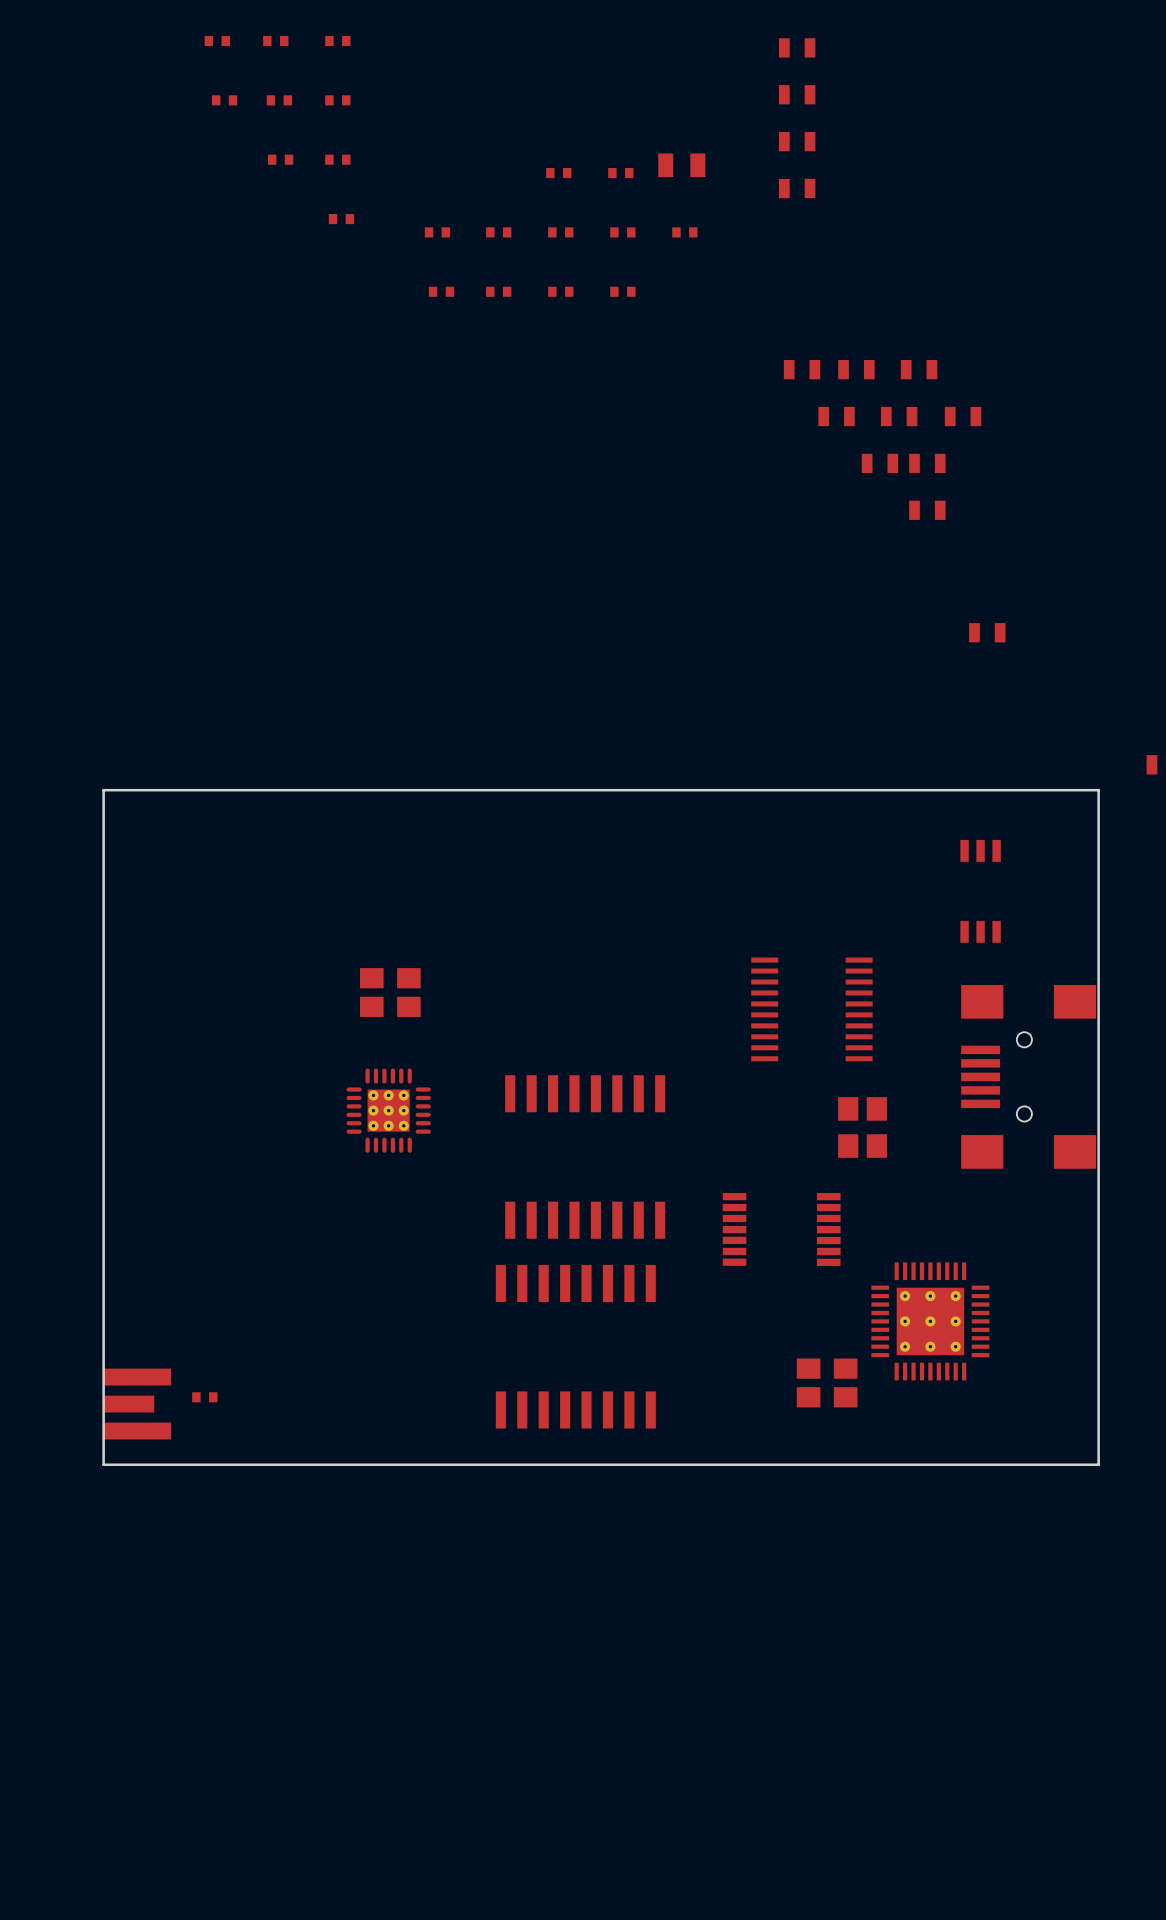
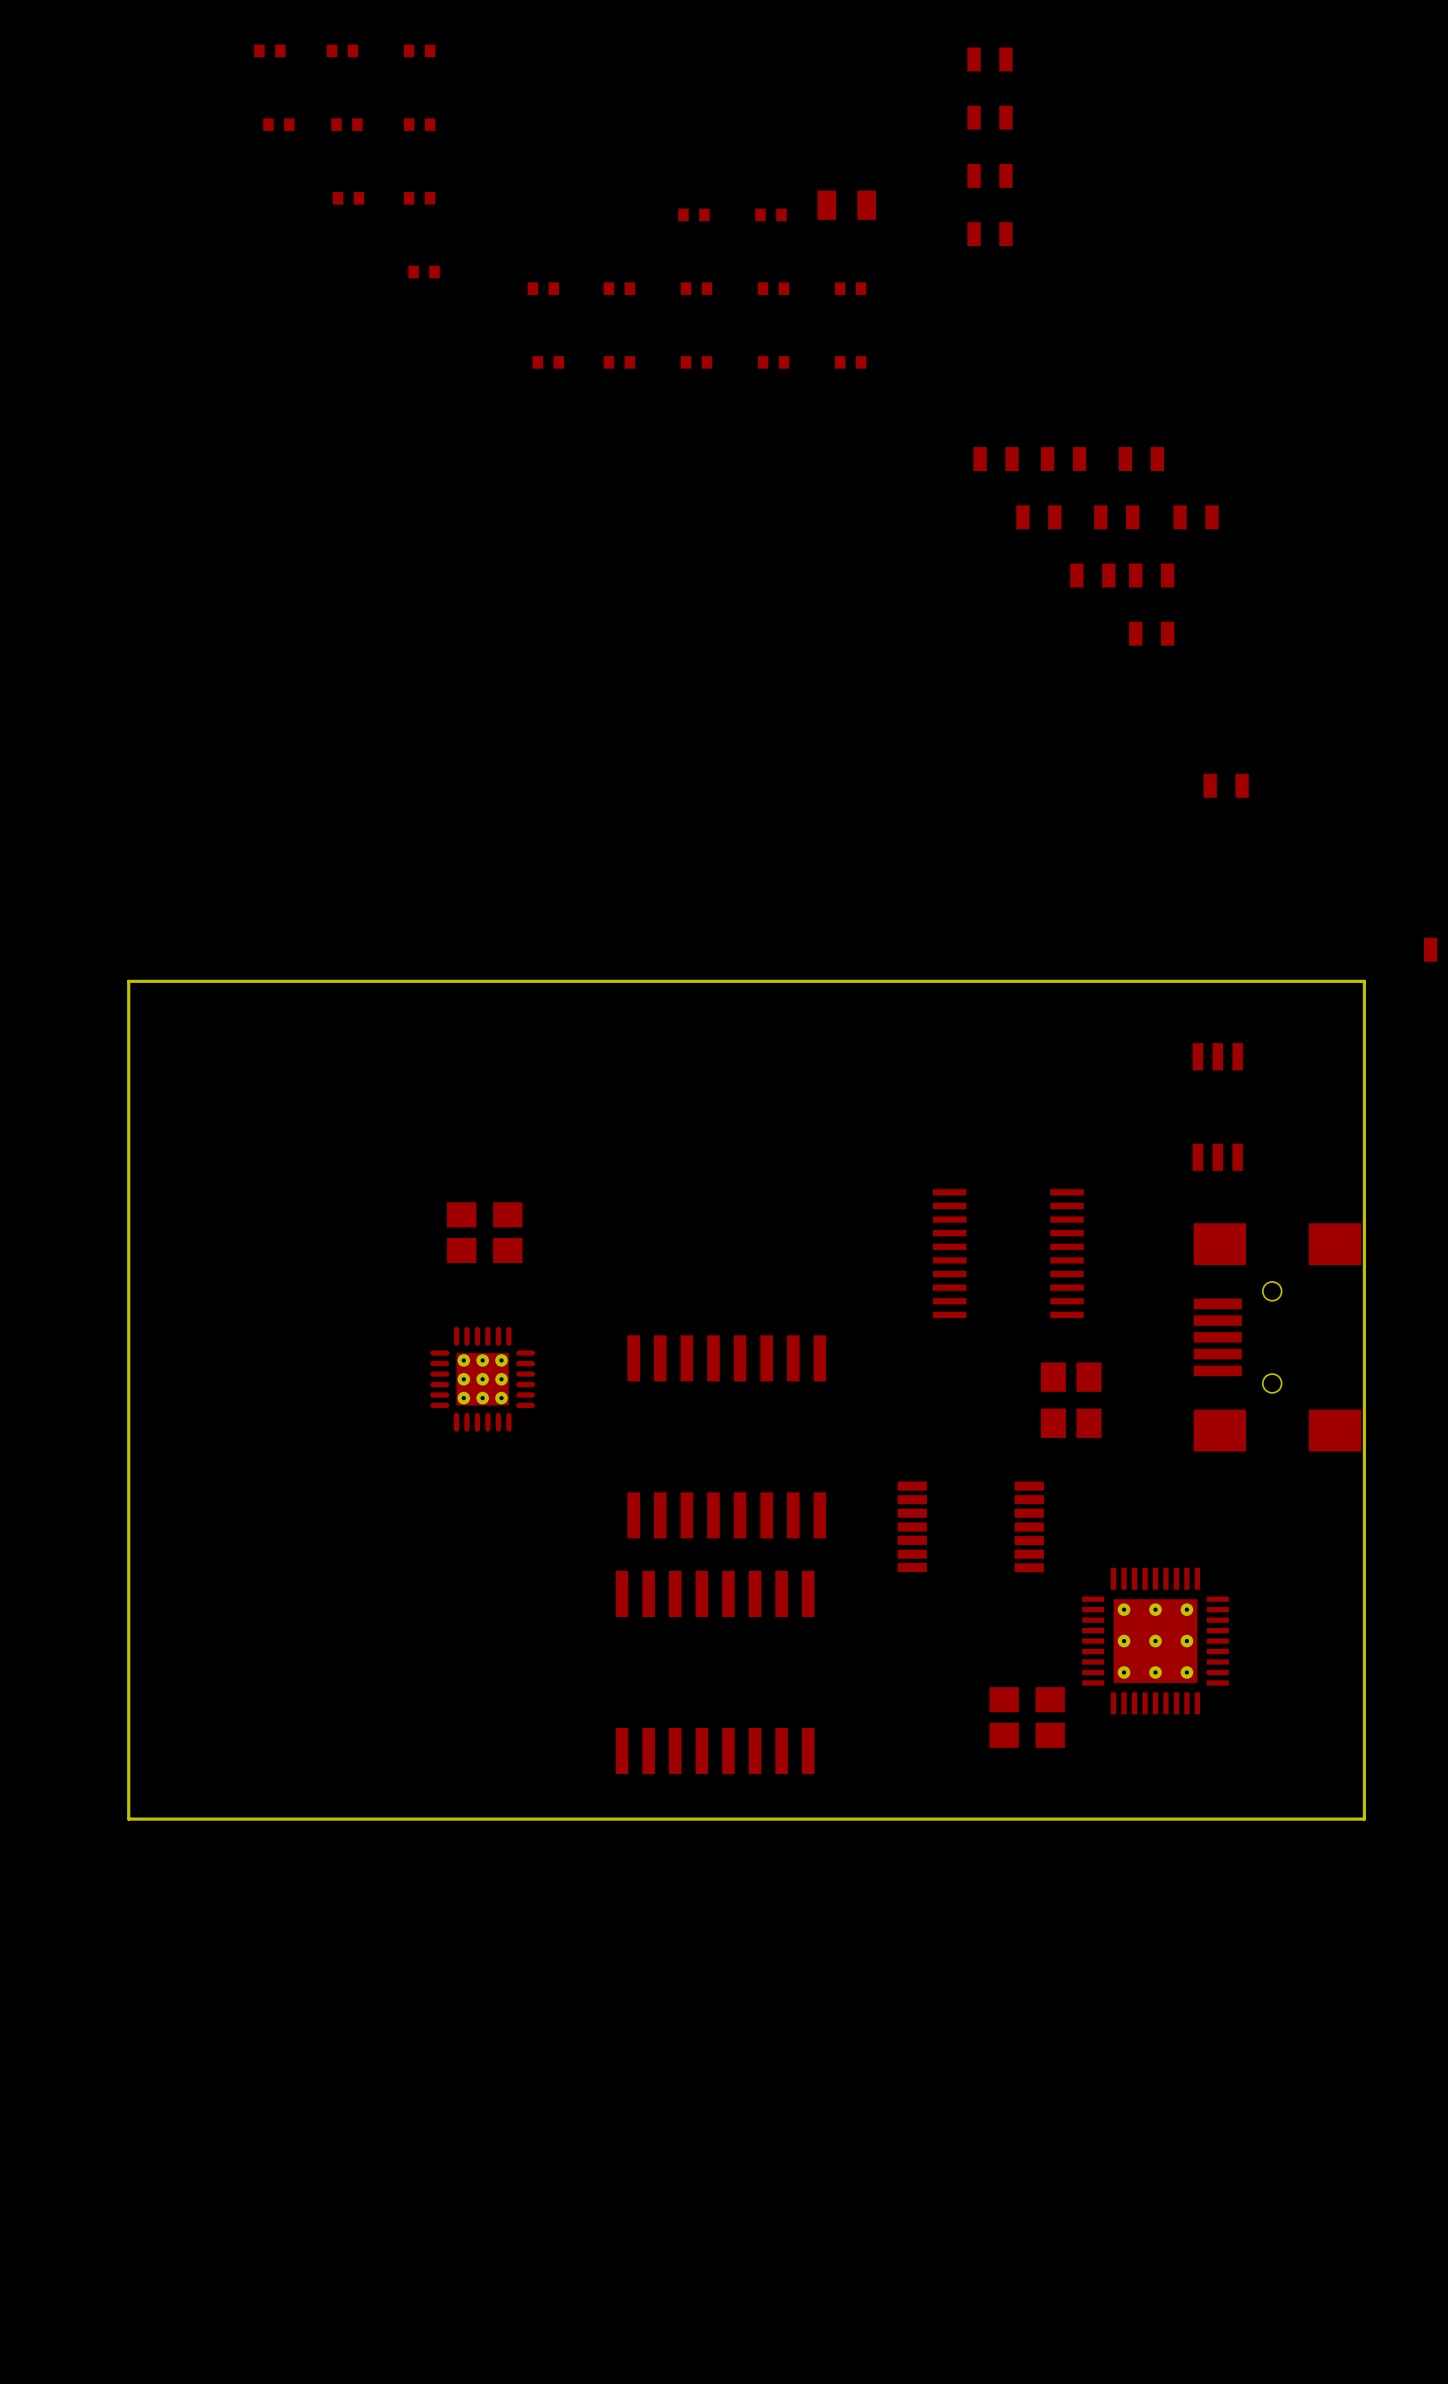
part: none -> (850, 362)
part: (204, 1397) -> none
part: (137, 1404) -> none

